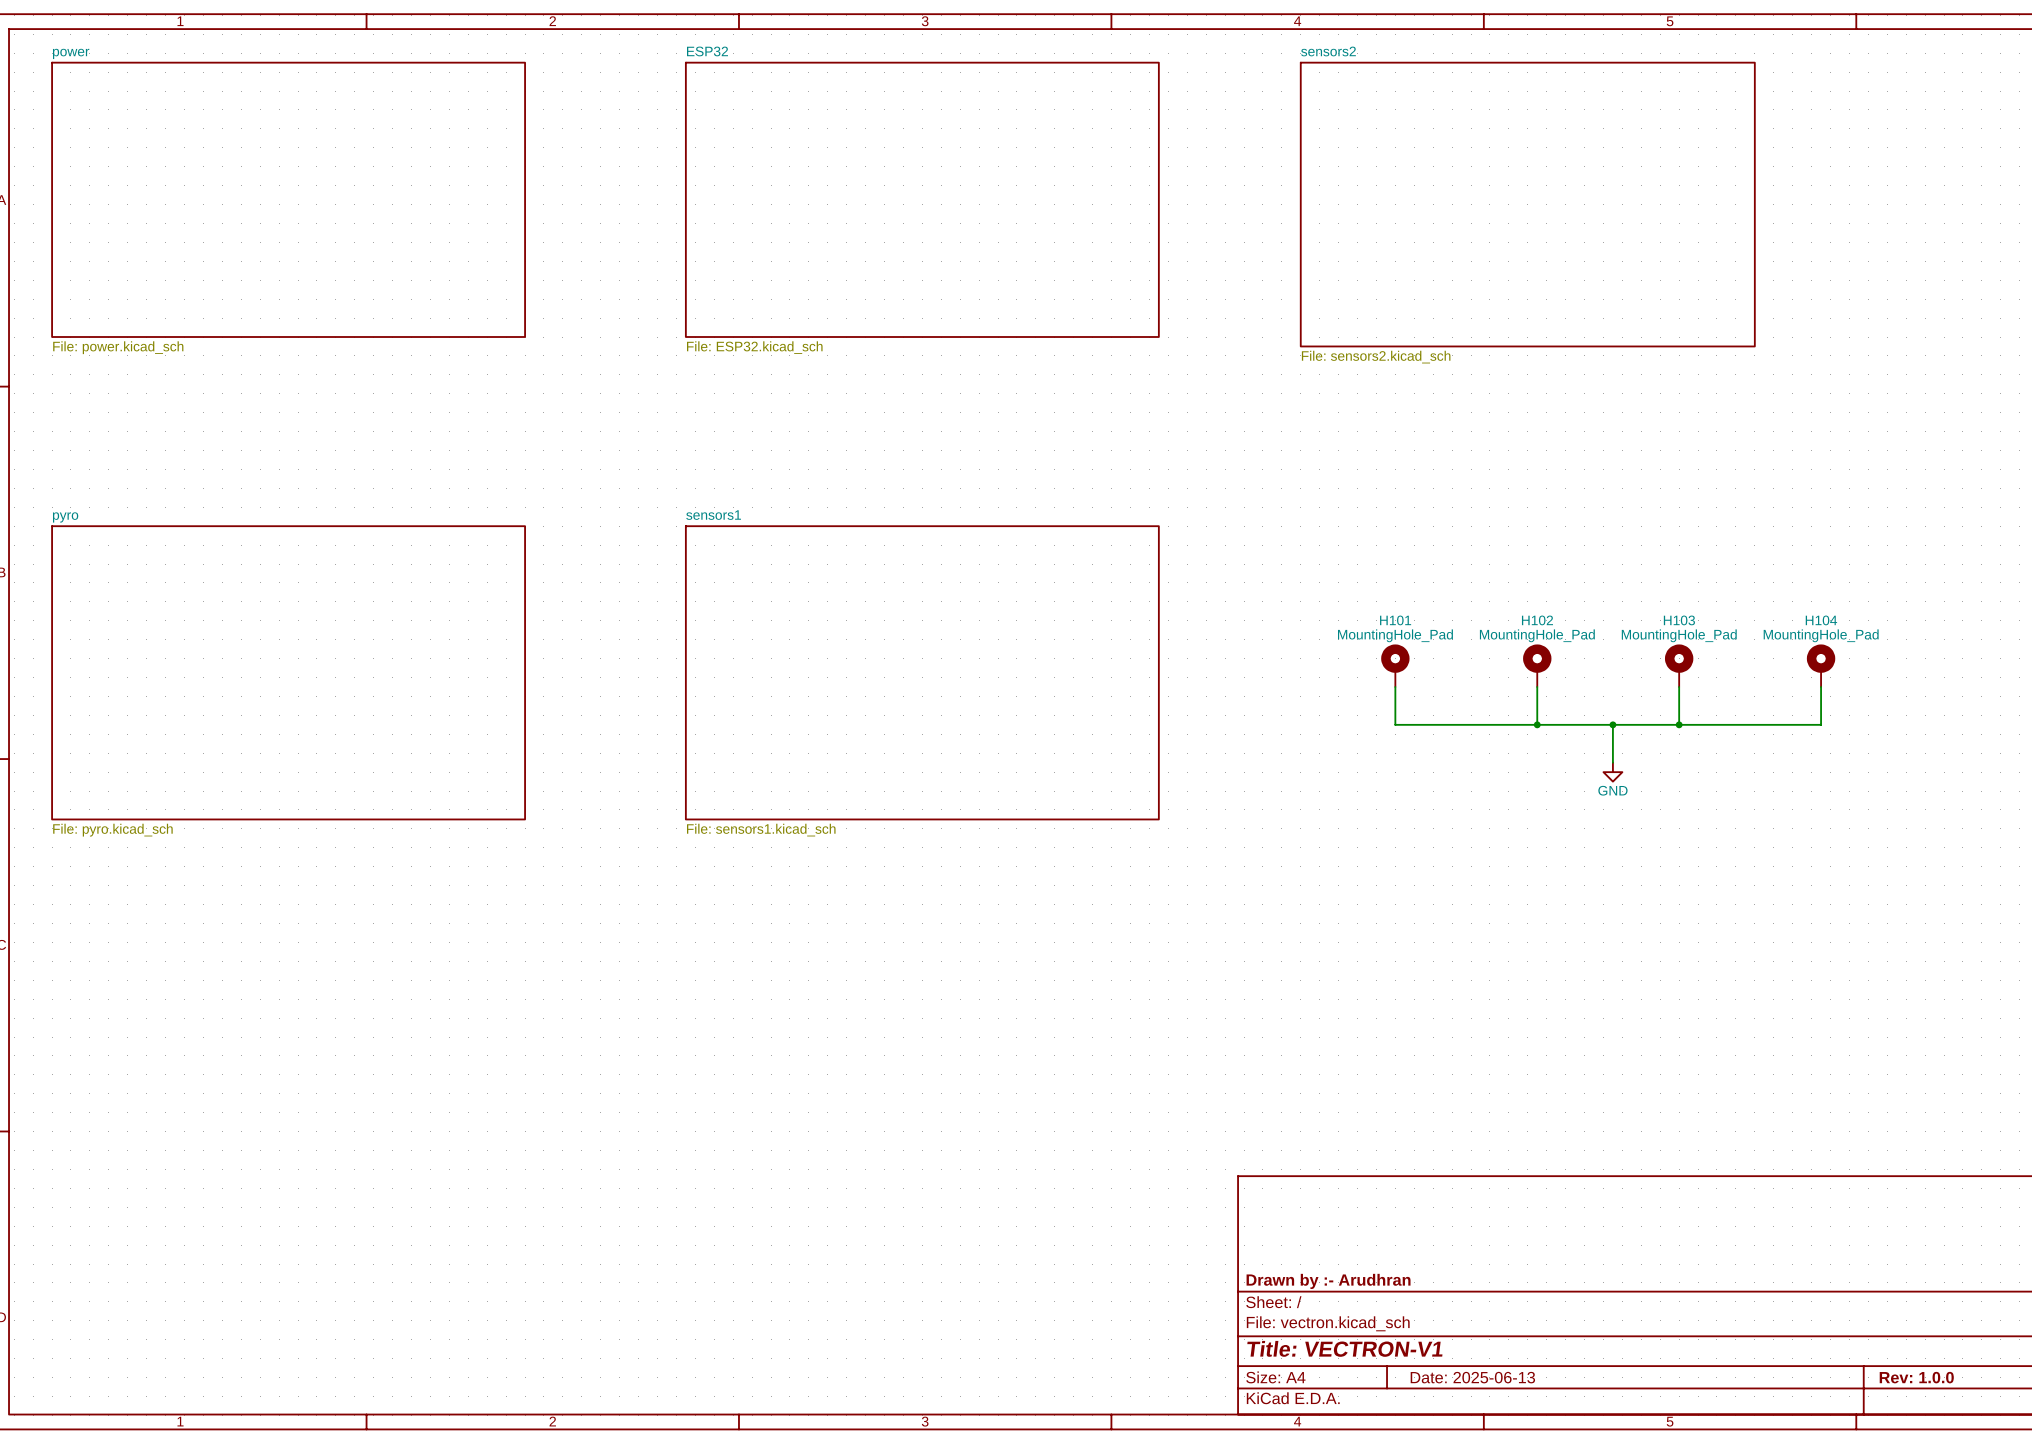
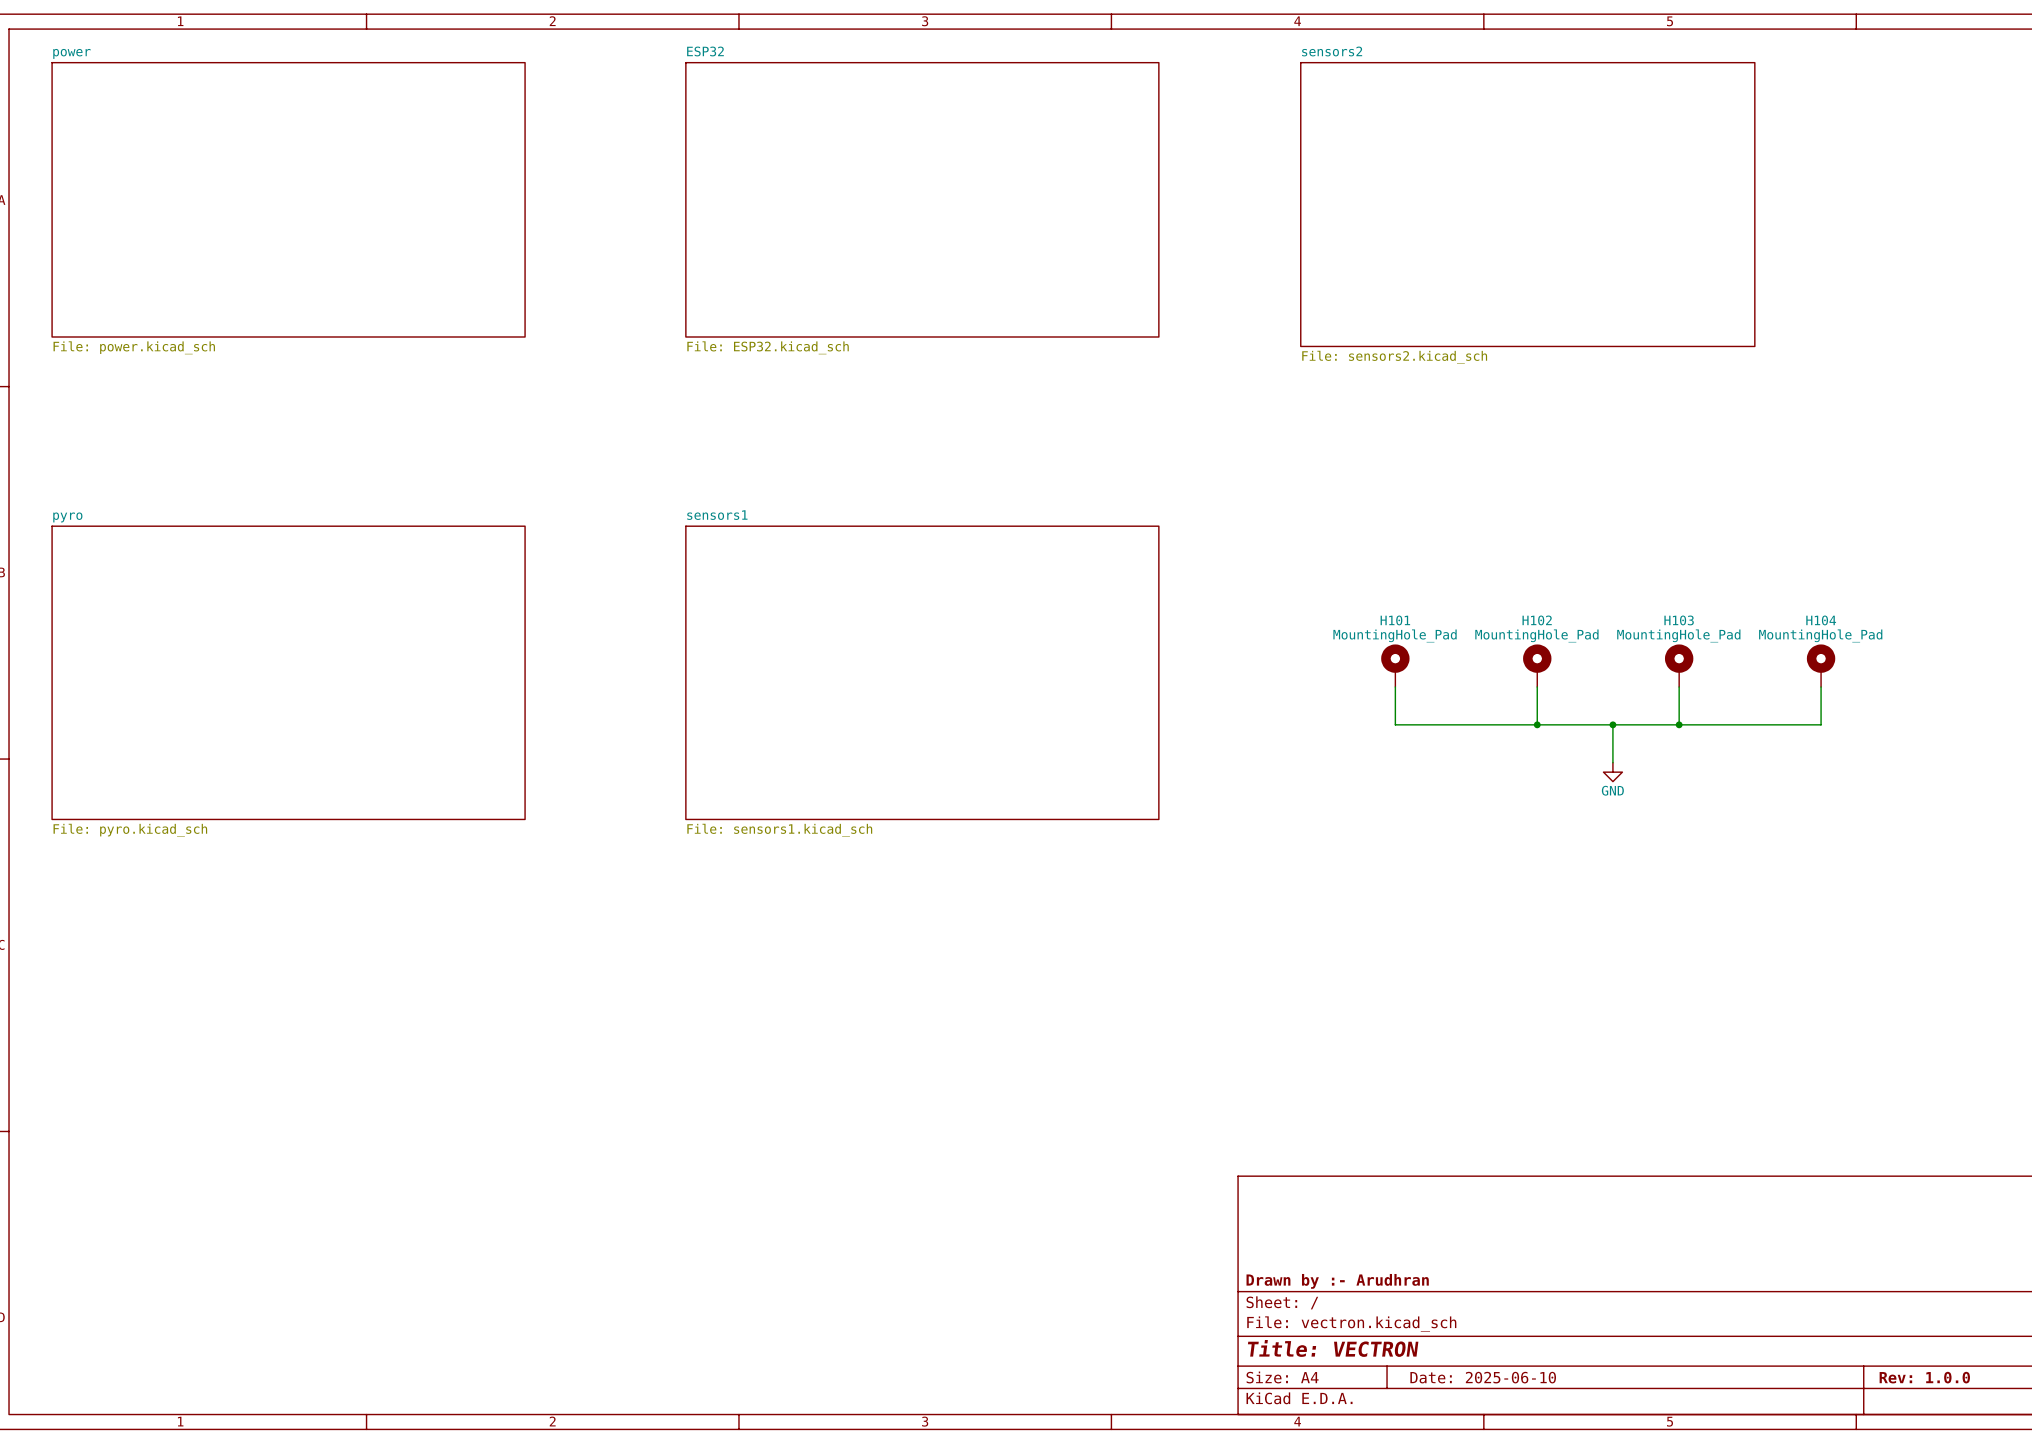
title block: Title: VECTRON-V1 (1344, 1348) -> Title: VECTRON (1333, 1348)
title block: Date: 2025-06-13 (1472, 1377) -> Date: 2025-06-10 (1483, 1377)

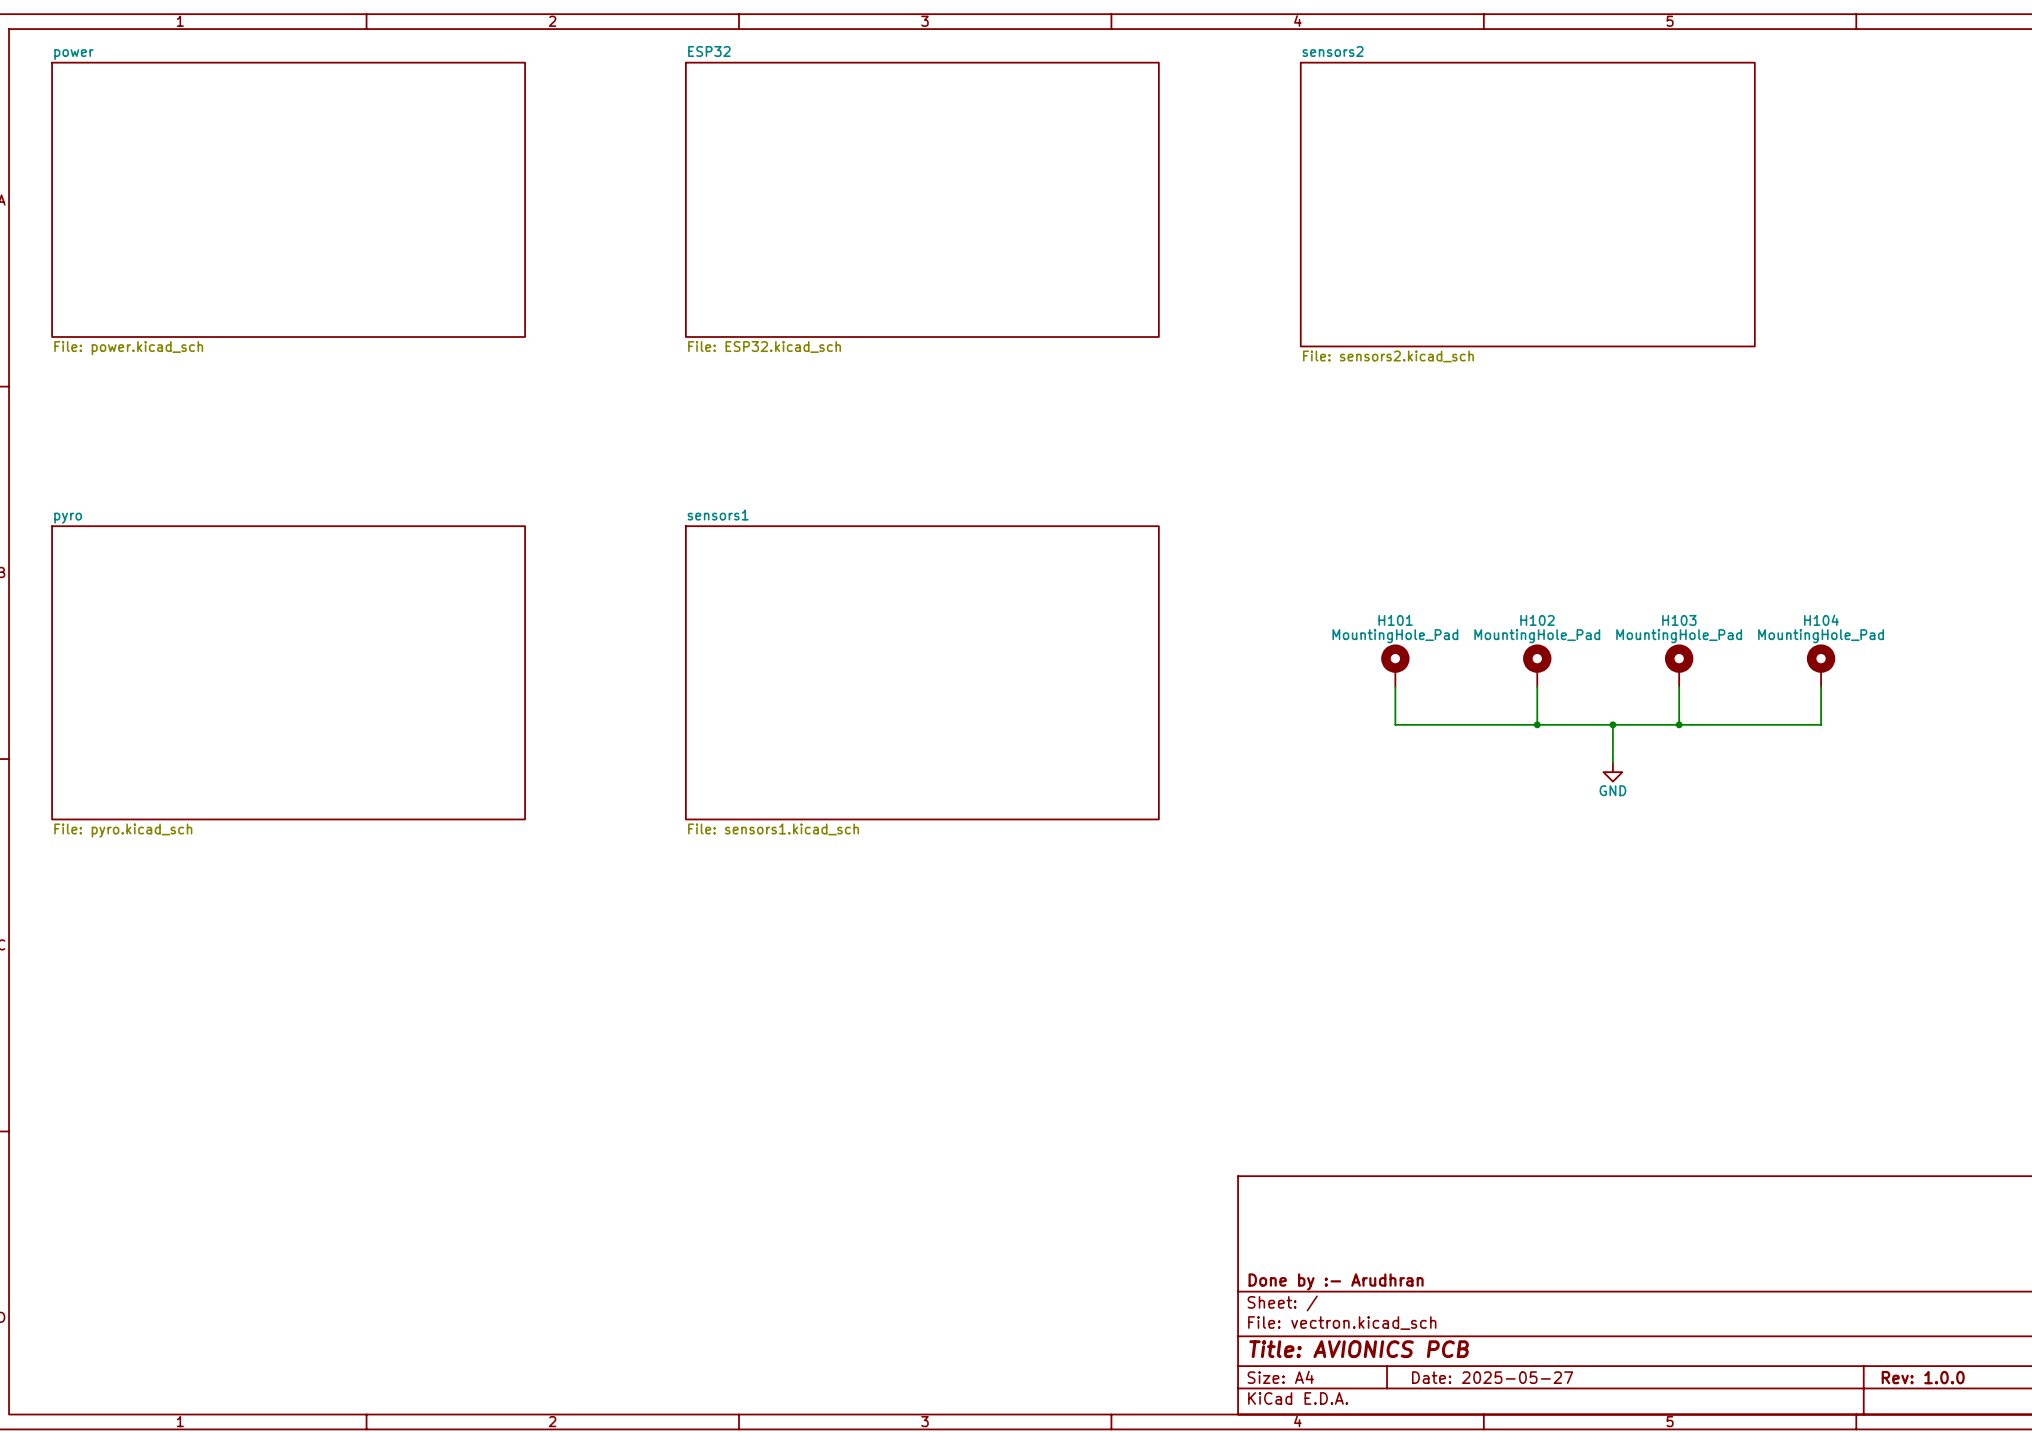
title block: Drawn by :- Arudhran (1337, 1281) -> Done by :- Arudhran (1336, 1281)
title block: Title: VECTRON (1333, 1348) -> Title: AVIONICS PCB (1359, 1349)
title block: Date: 2025-06-10 (1483, 1377) -> Date: 2025-05-27 (1492, 1377)

